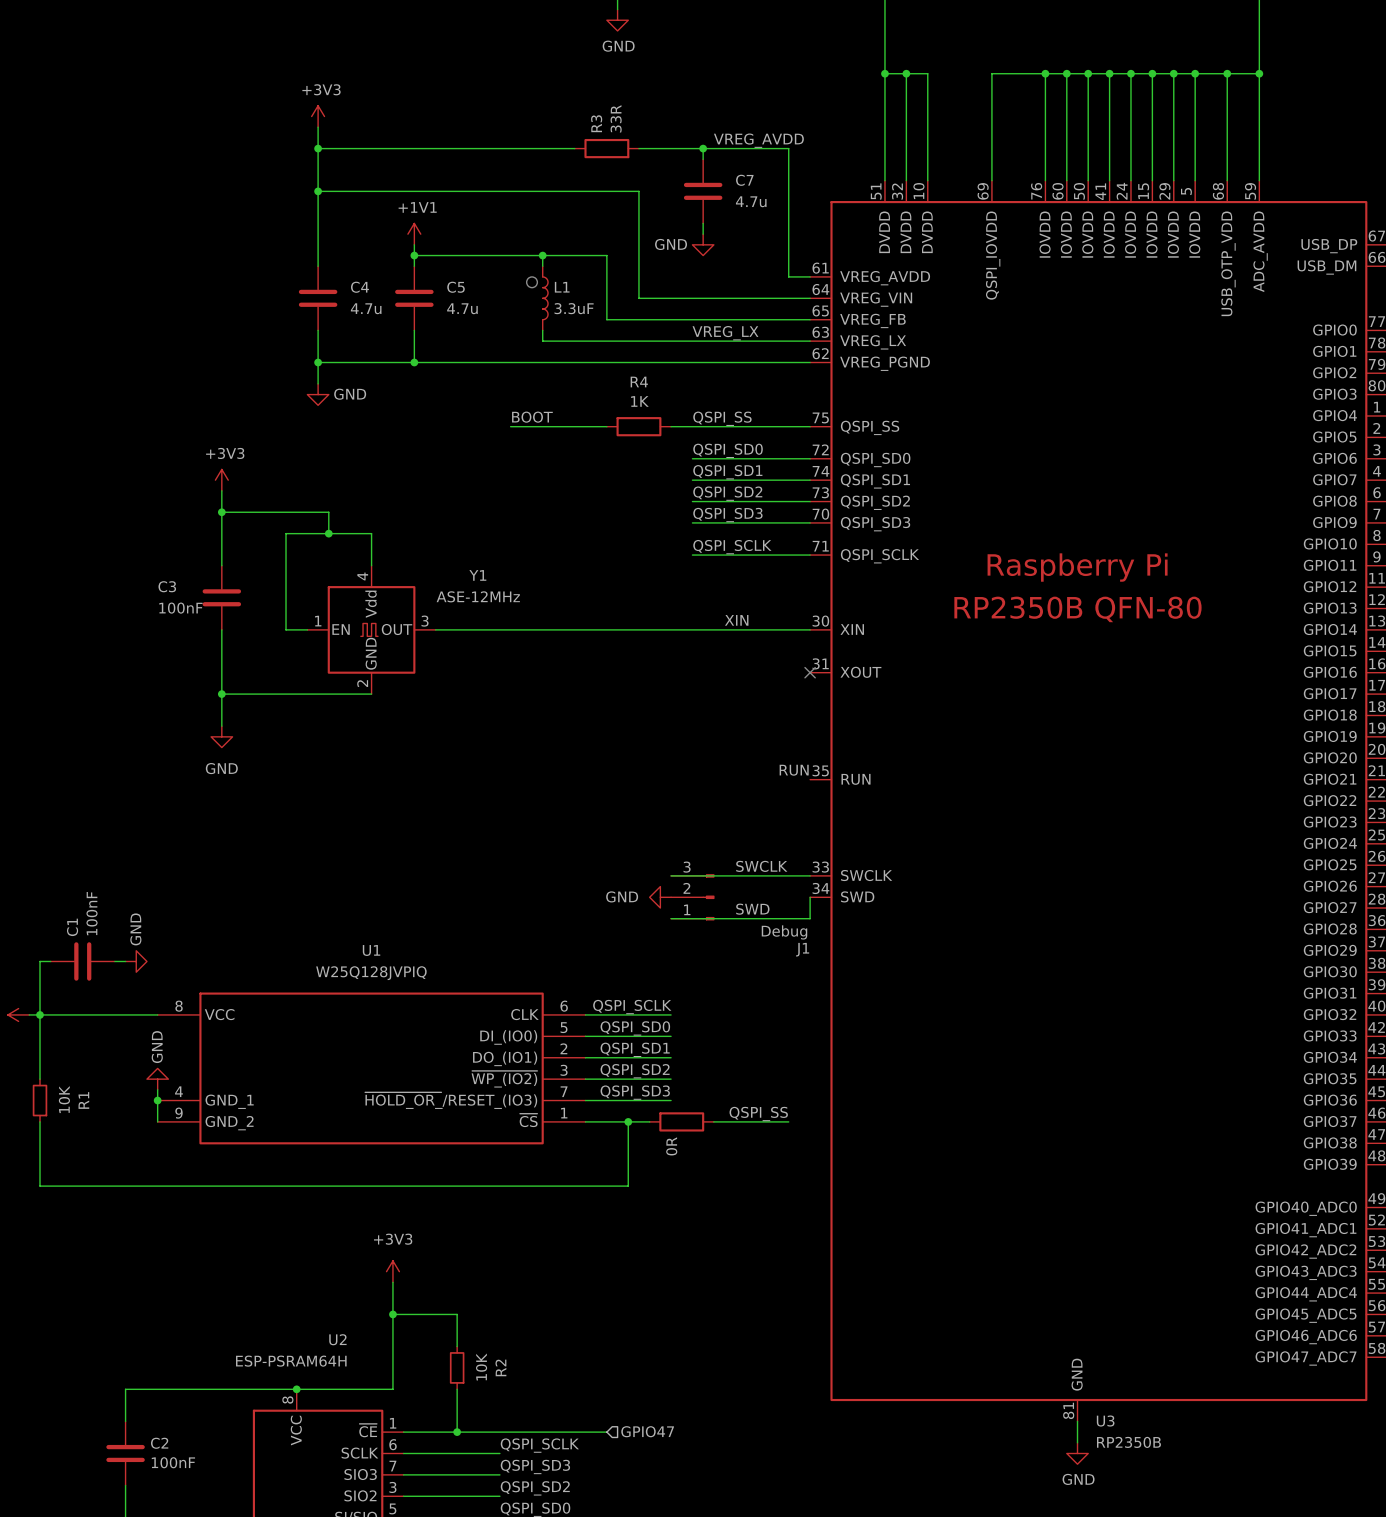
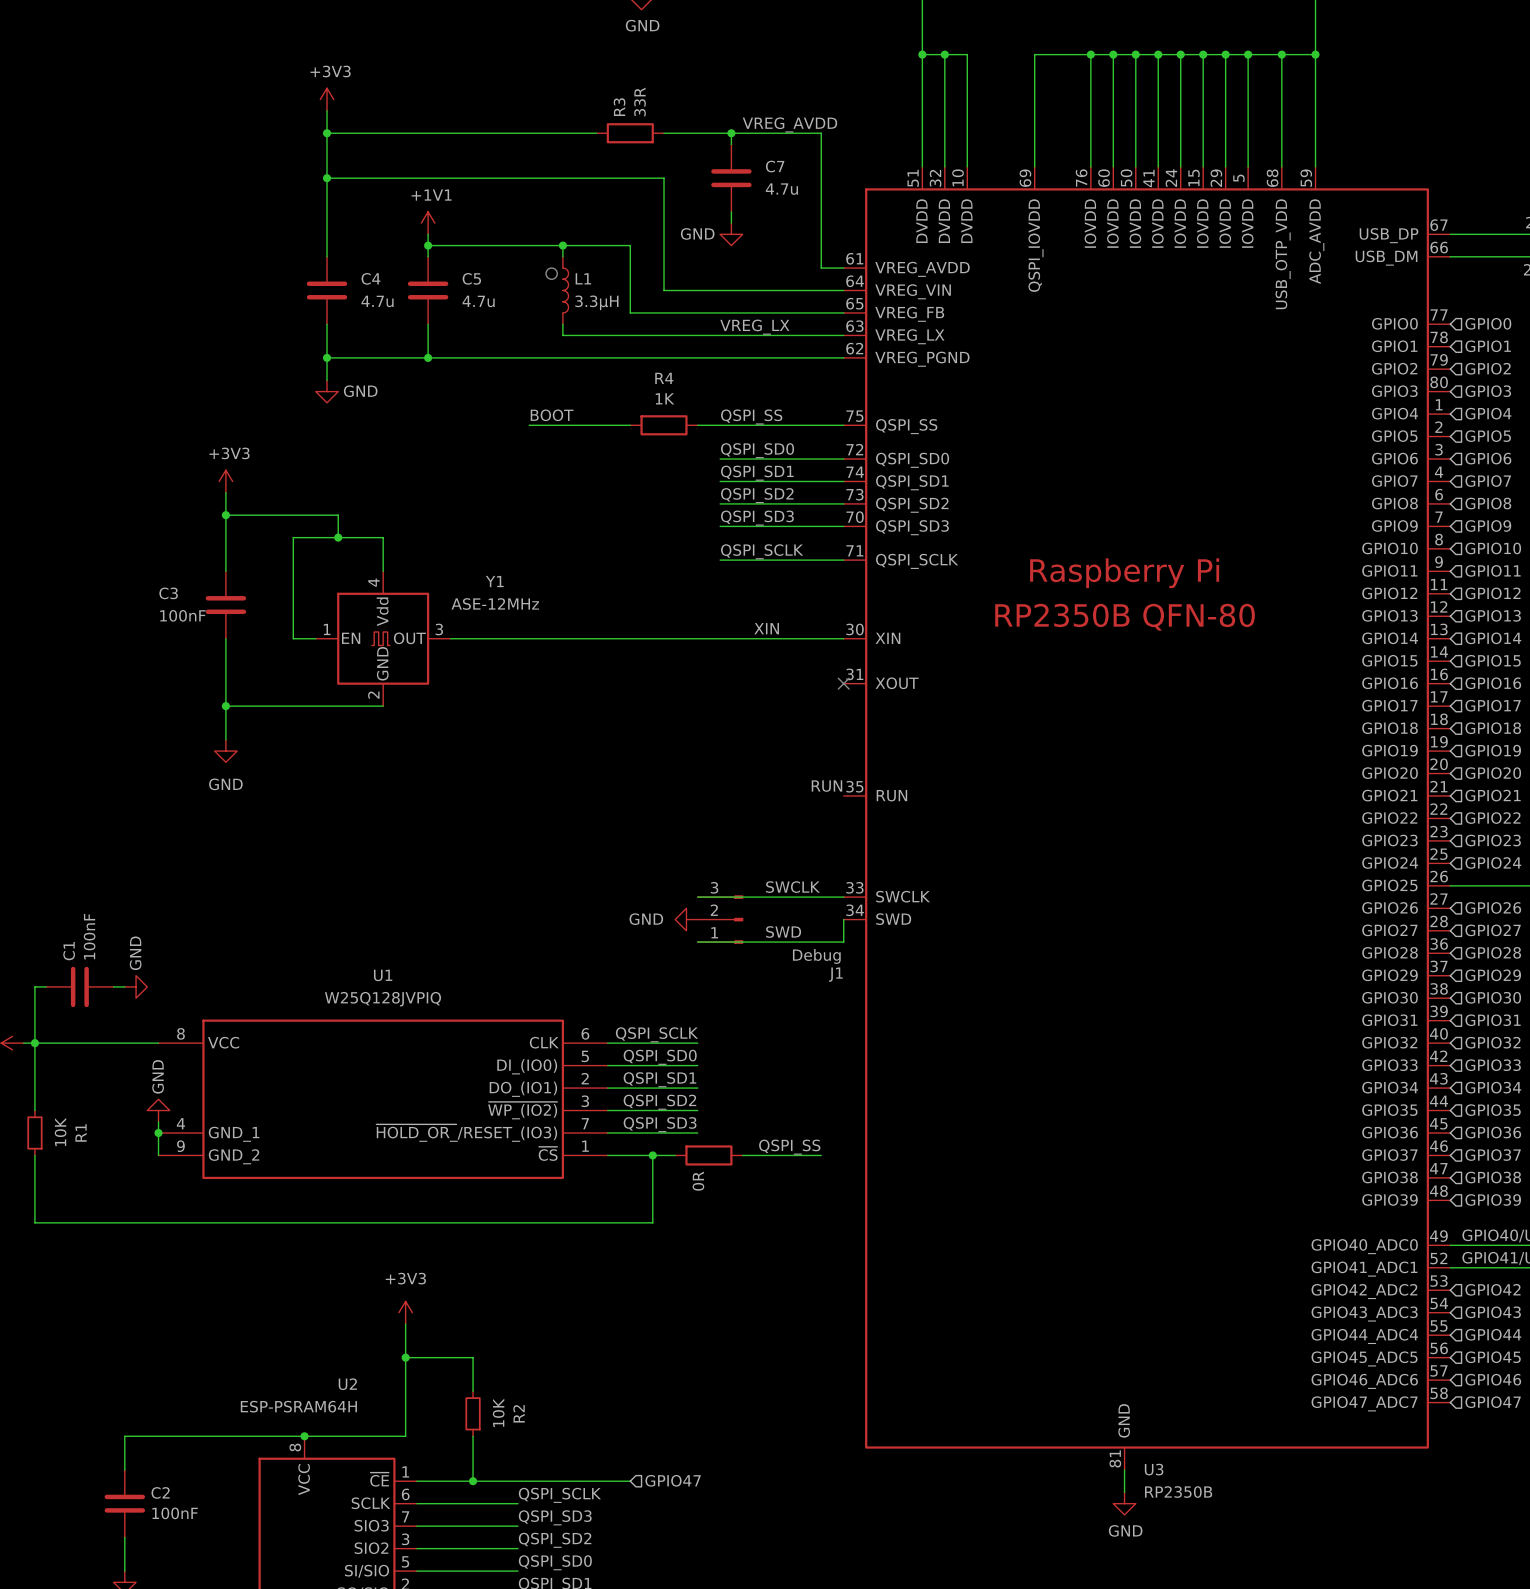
L1 value: 3.3uF (574, 308) -> 3.3µH (596, 302)

